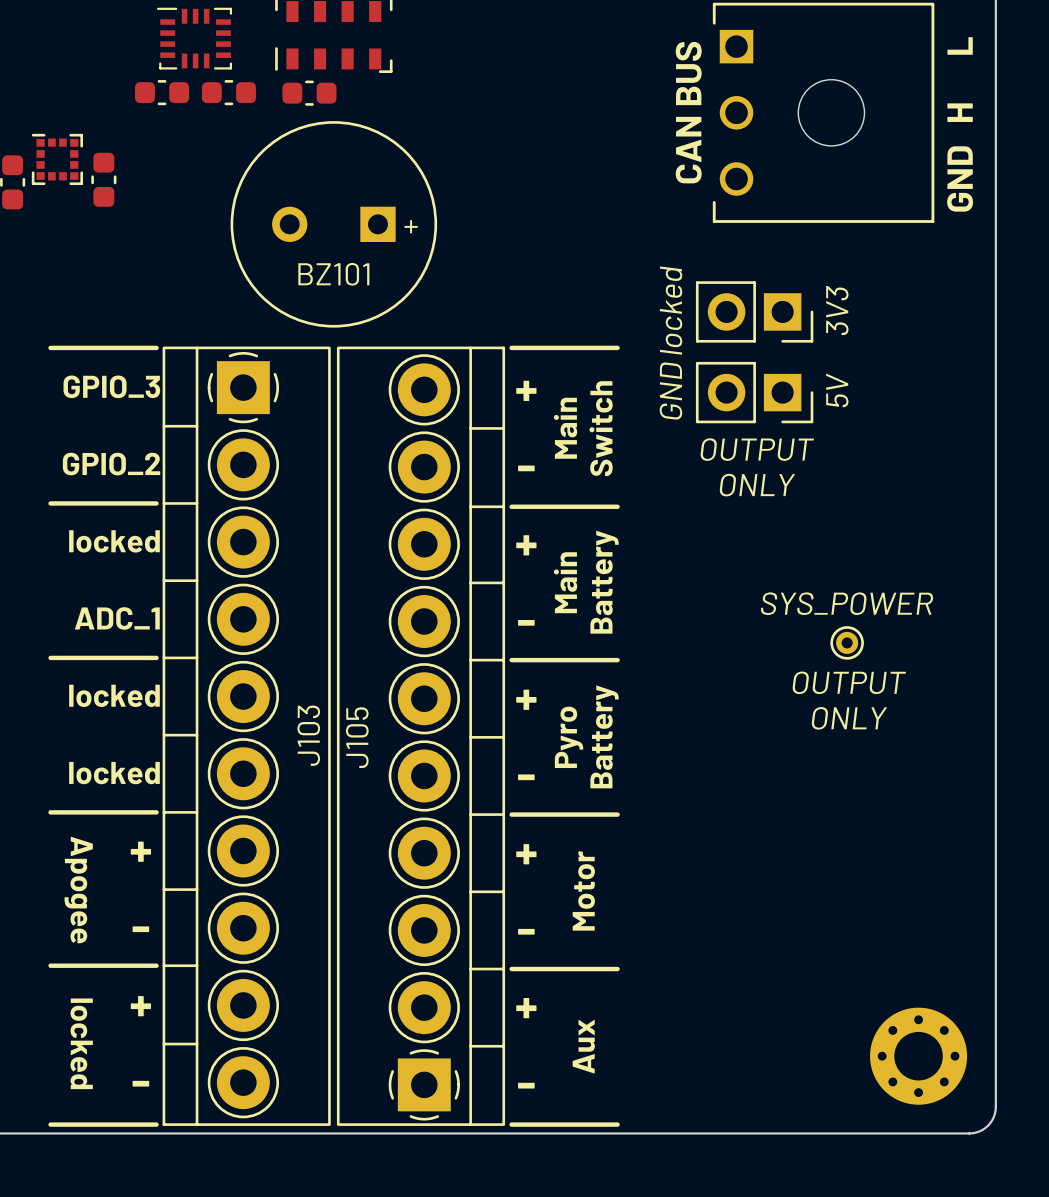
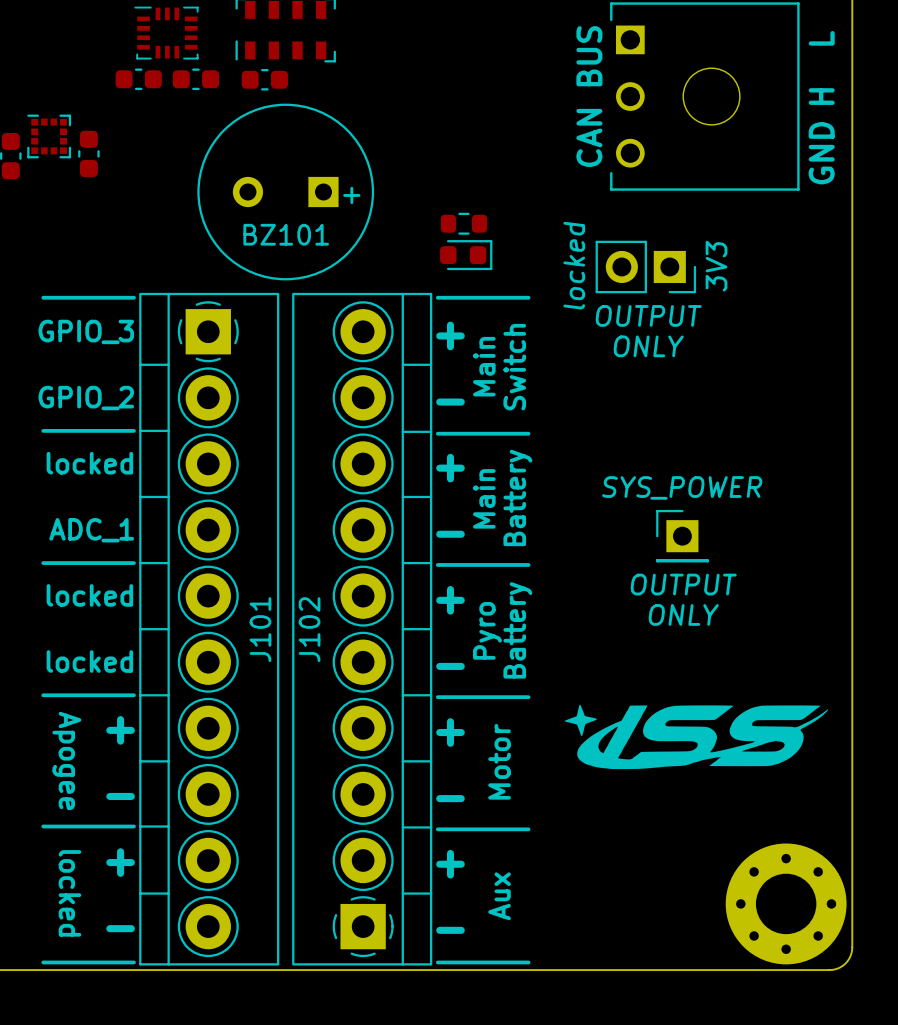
part: none -> (463, 223)
part: none -> (466, 255)
text: GND (670, 390) -> none
text: 5V (837, 390) -> none
part: (754, 392) -> none
text position: OUTPUT (757, 449) -> OUTPUT (648, 315)
text position: ONLY (757, 485) -> ONLY (648, 346)
text position: SYS_POWER (847, 603) -> SYS_POWER (682, 487)
part: none -> (682, 536)
part: (847, 642) -> none
text position: OUTPUT (849, 682) -> OUTPUT (683, 584)
text position: ONLY (849, 718) -> ONLY (683, 614)
J101: none -> (209, 629)
J102: none -> (362, 629)
J103: (246, 736) -> none
J105: (421, 736) -> none
drawing: none -> [564, 704, 829, 770]
part footprint: [870, 1007, 968, 1105] -> [725, 843, 847, 965]

